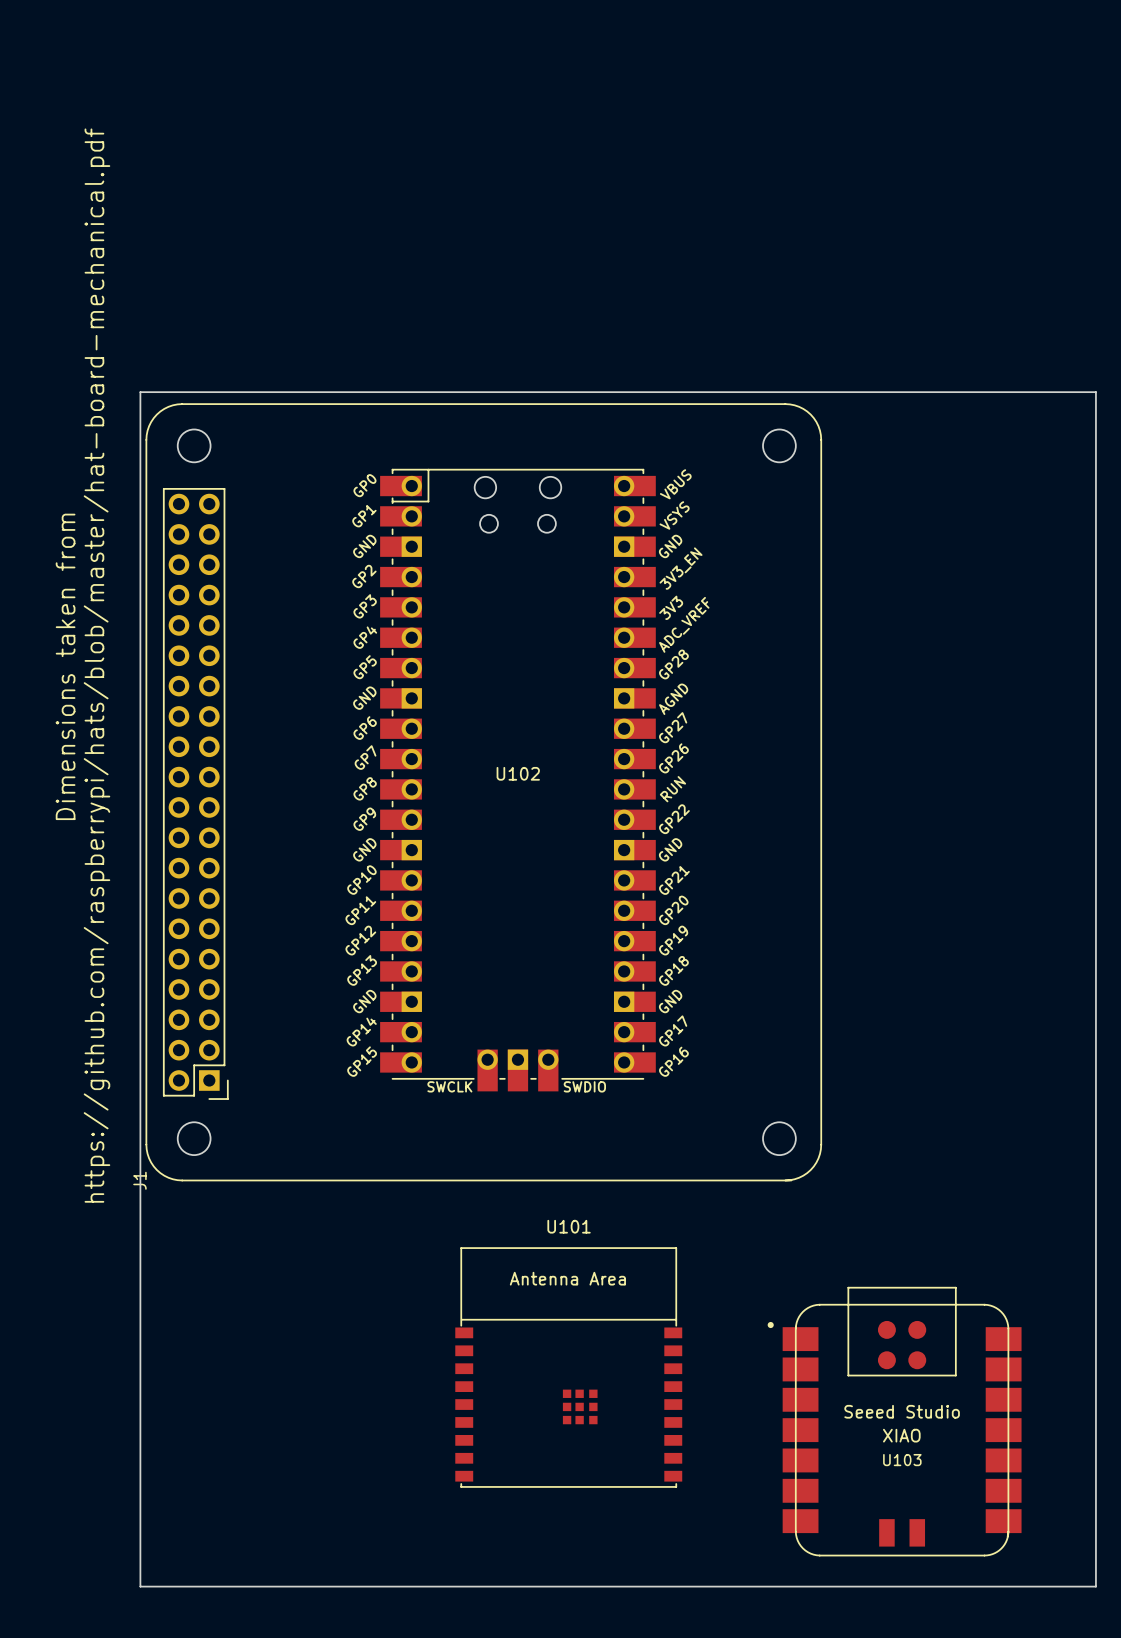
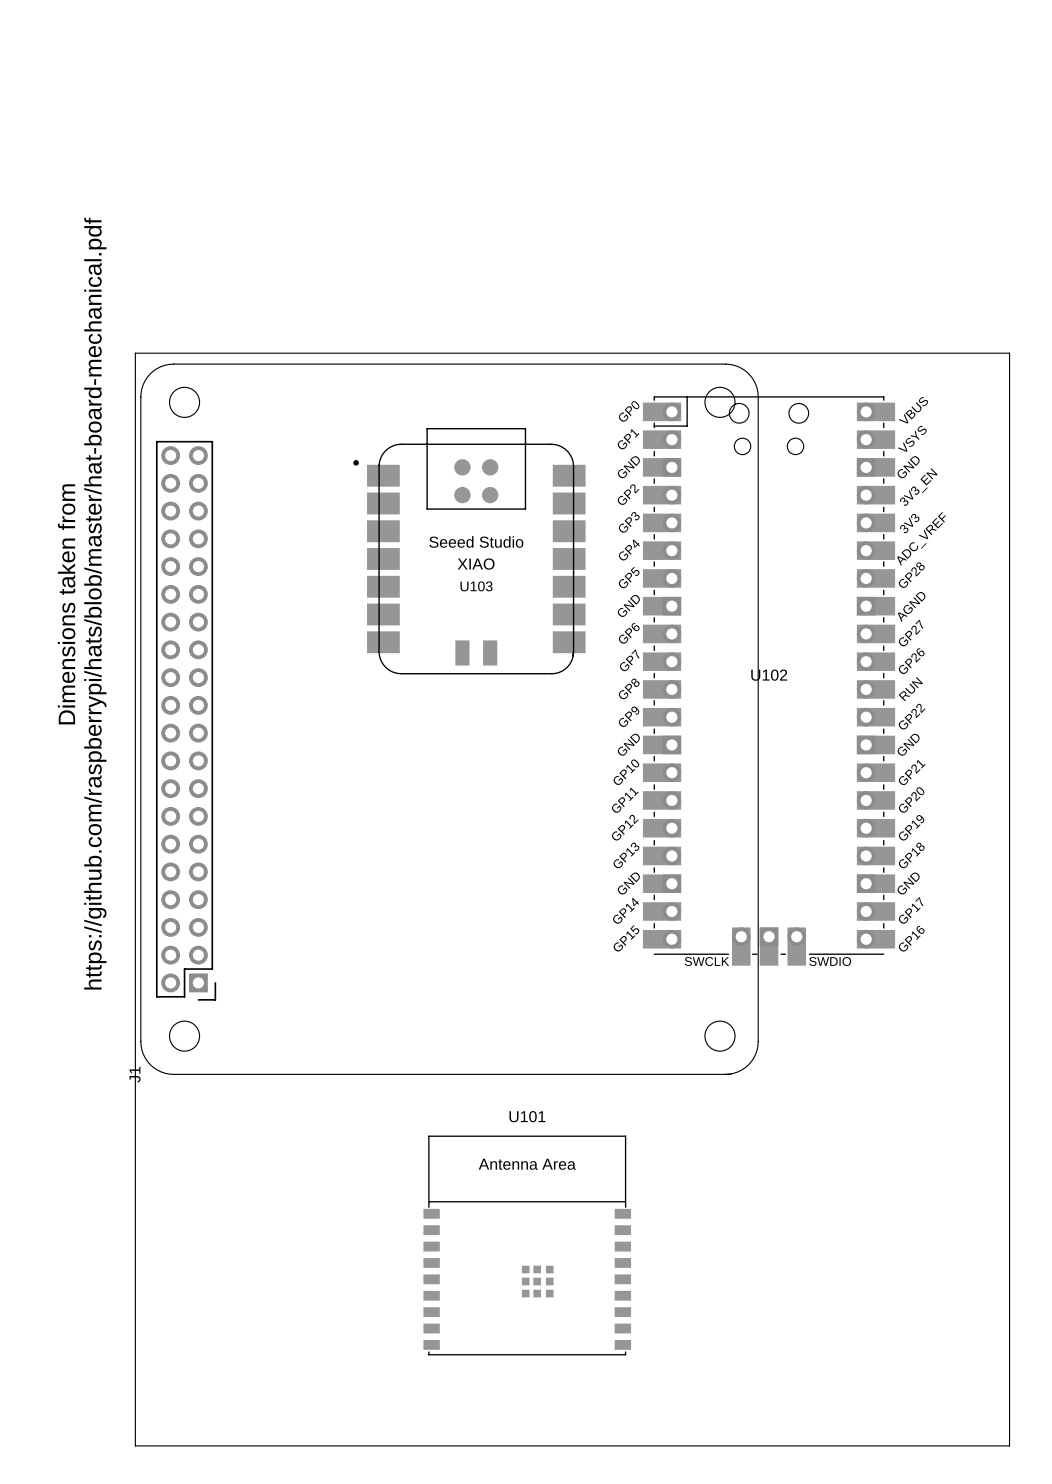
U102 position: (517, 780) -> (769, 680)
U103 position: (894, 1421) -> (469, 551)

